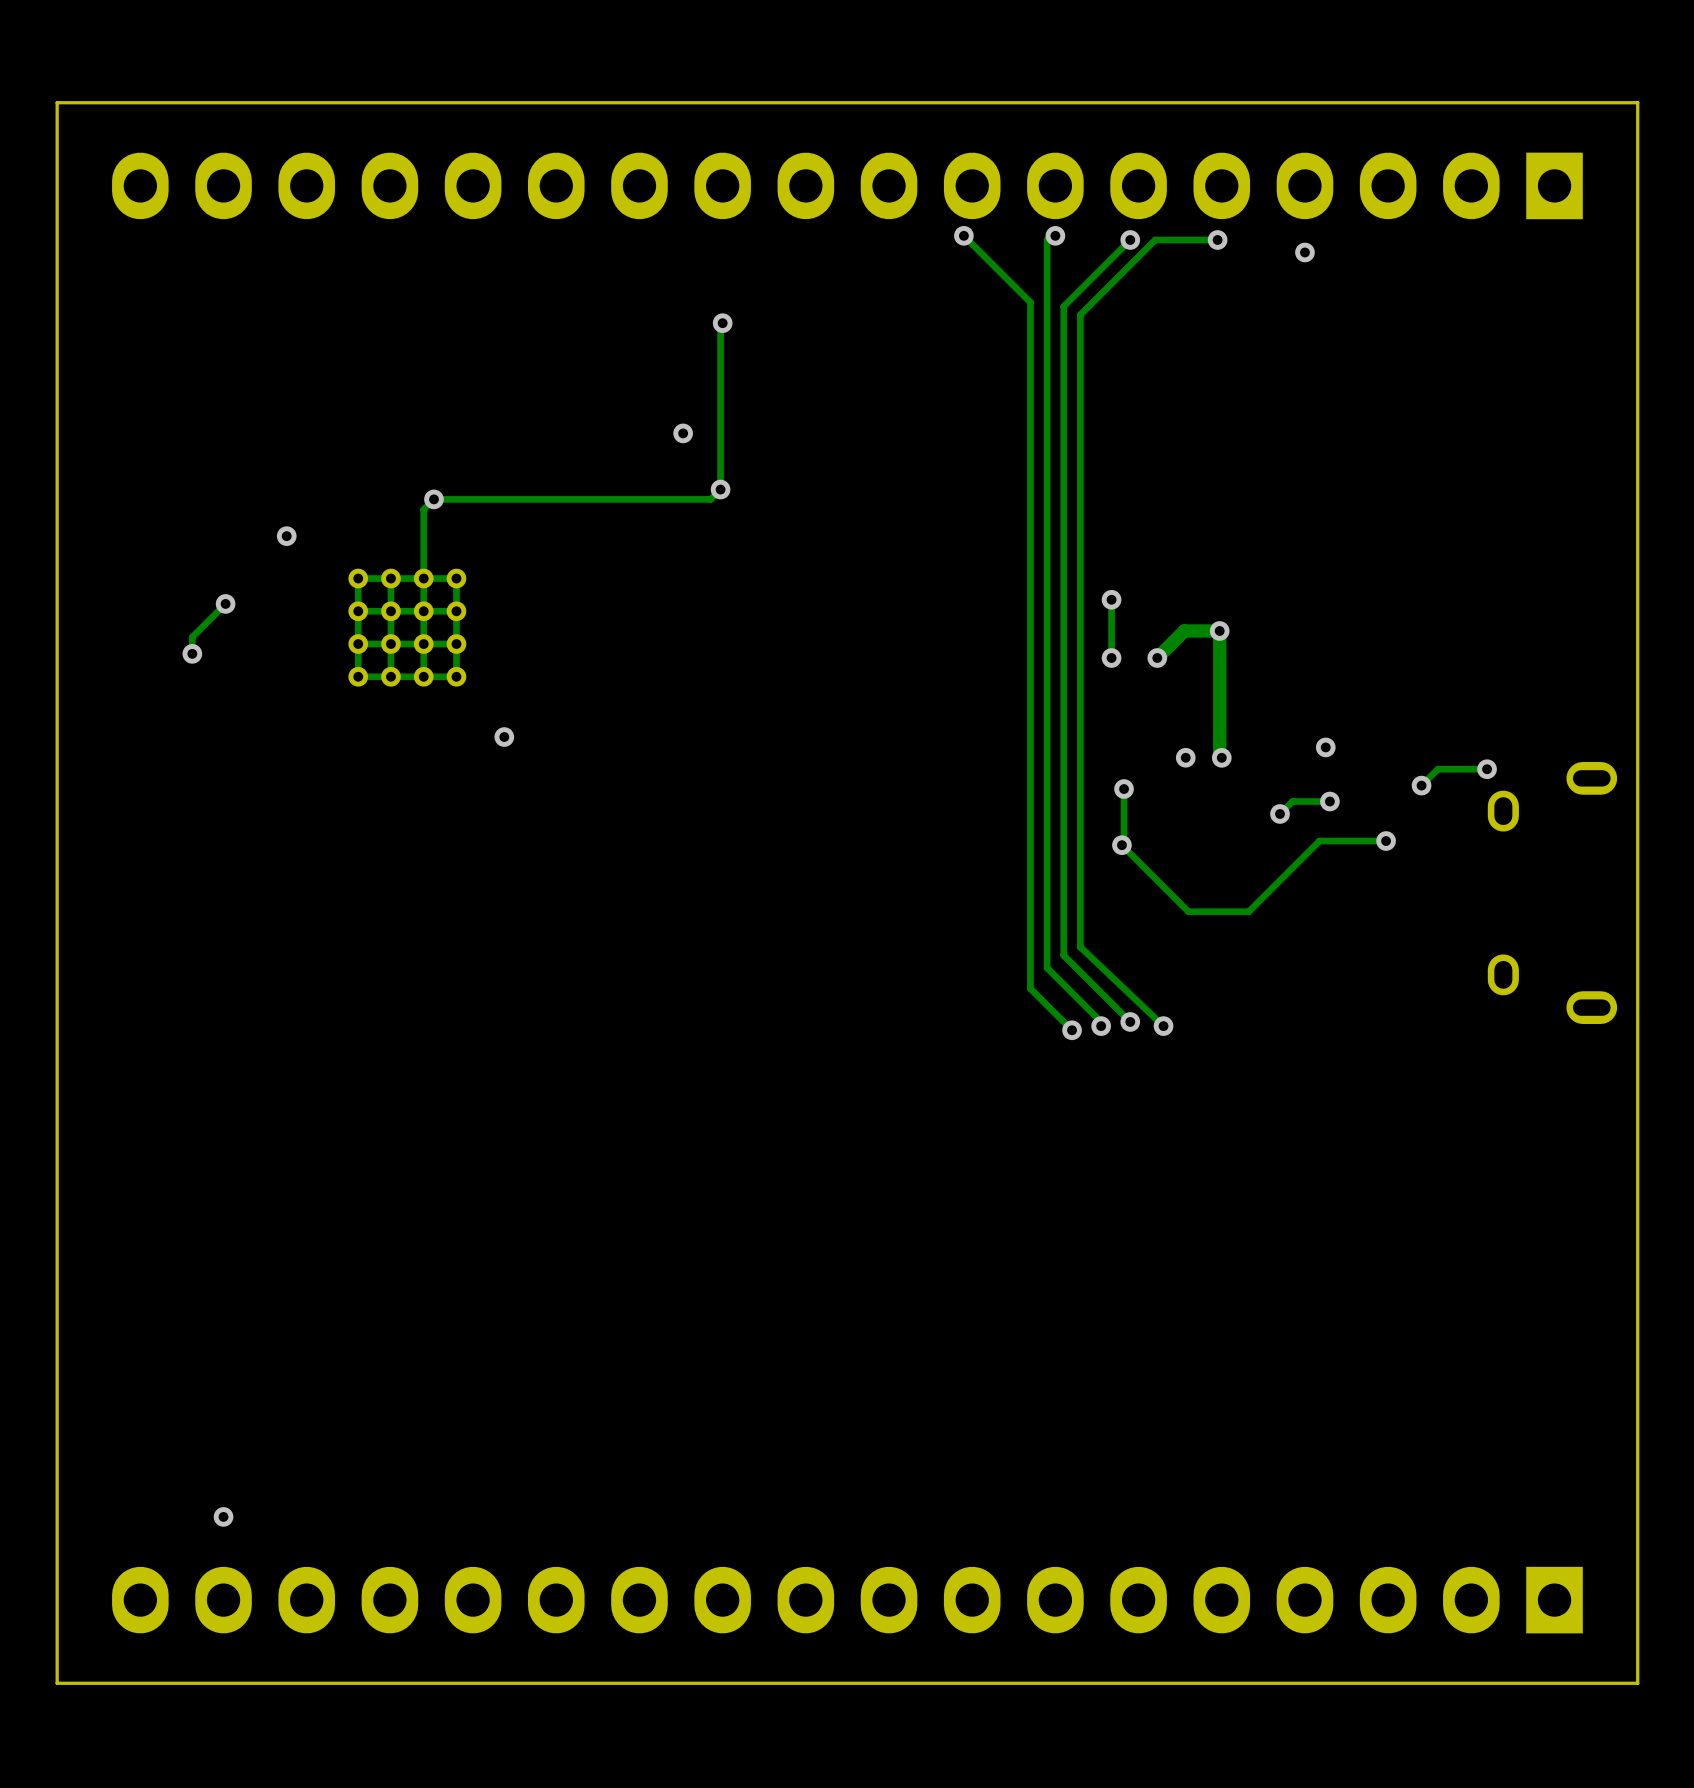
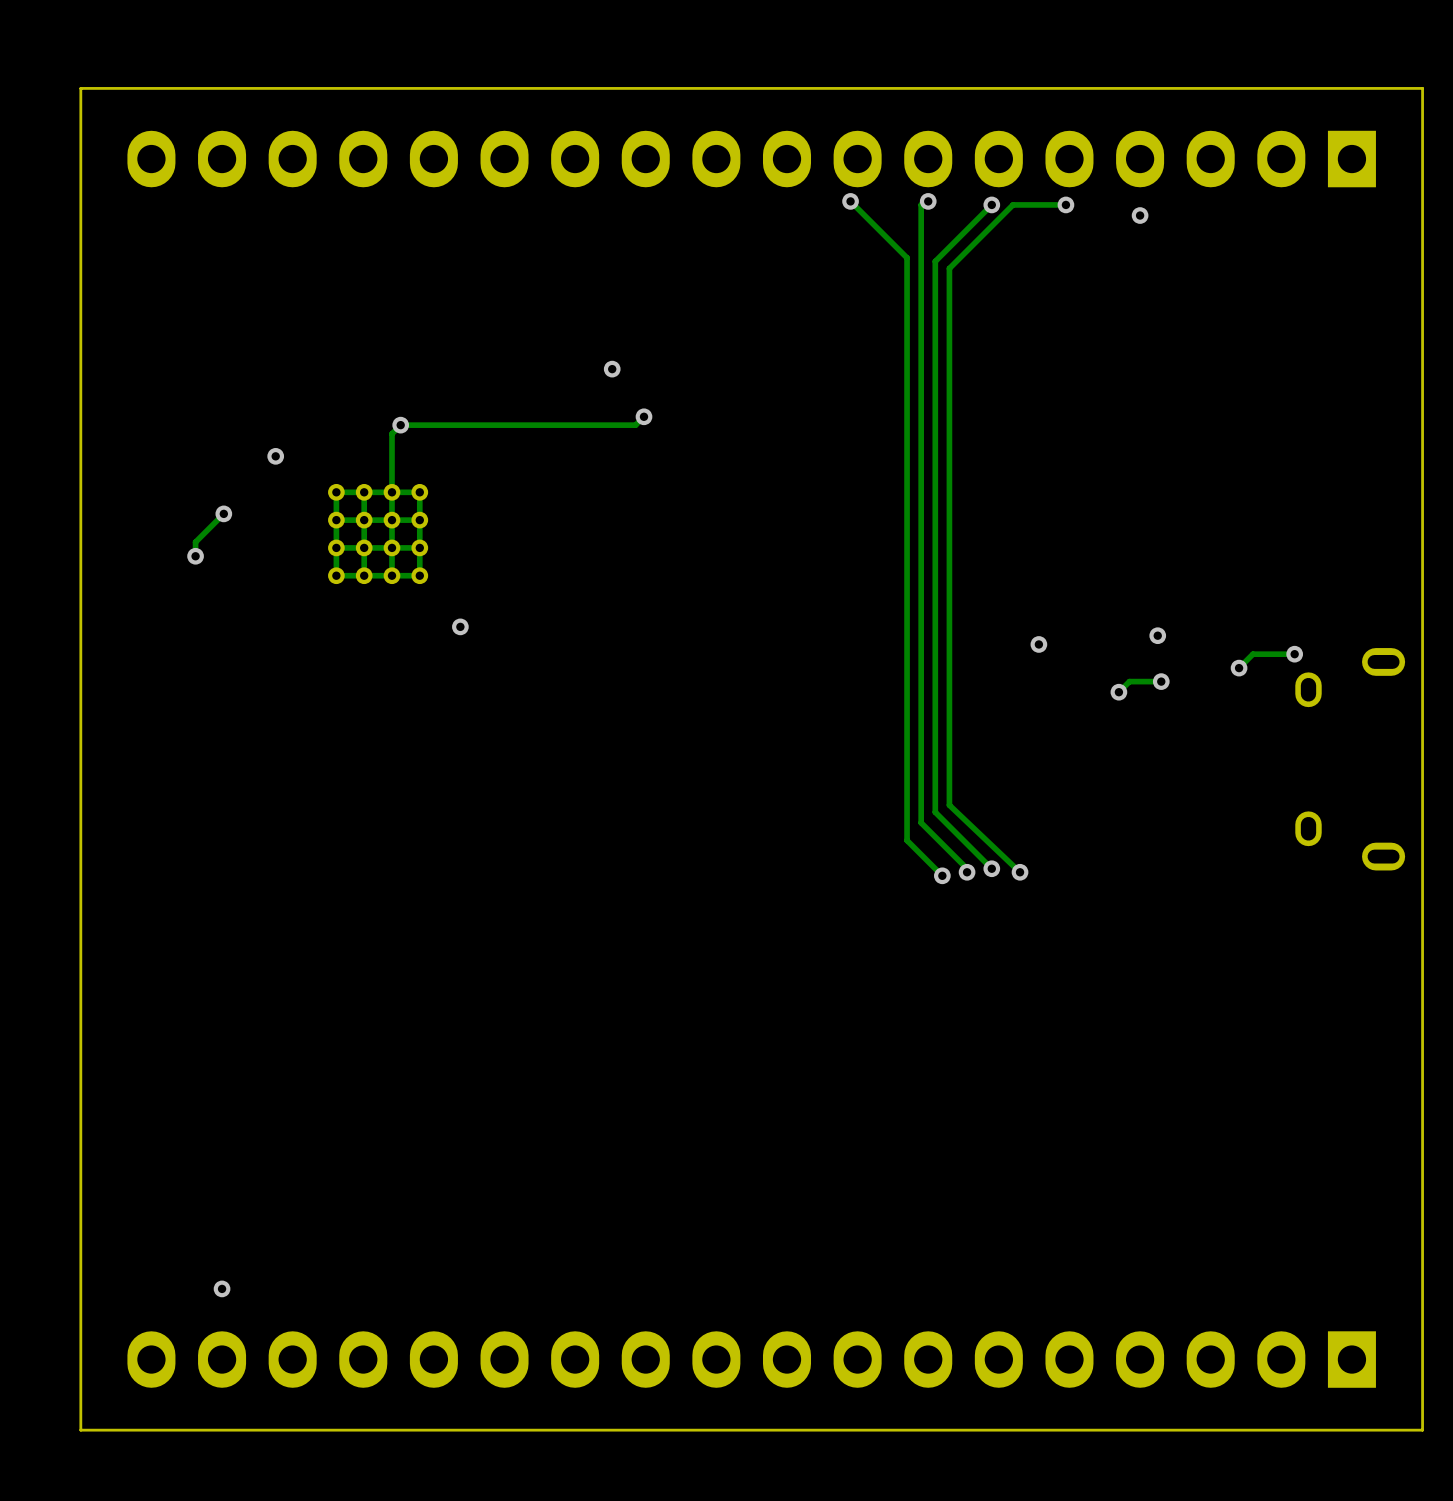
track: (722, 323) (720, 325) (720, 489) -> none
via: (722, 323) -> none
track: (1111, 599) (1111, 658) -> none
via: (1111, 599) -> none
via: (1219, 630) -> none
via: (1111, 658) -> none
track: (1157, 658) (1184, 630) (1219, 630) (1219, 755) (1221, 757) -> none
via: (1157, 658) -> none
via: (1221, 757) -> none
track: (1124, 789) (1124, 843) (1121, 845) (1188, 911) (1248, 911) (1319, 841) (1386, 841) -> none
via: (1124, 789) -> none
via: (1386, 841) -> none
via: (1121, 845) -> none

